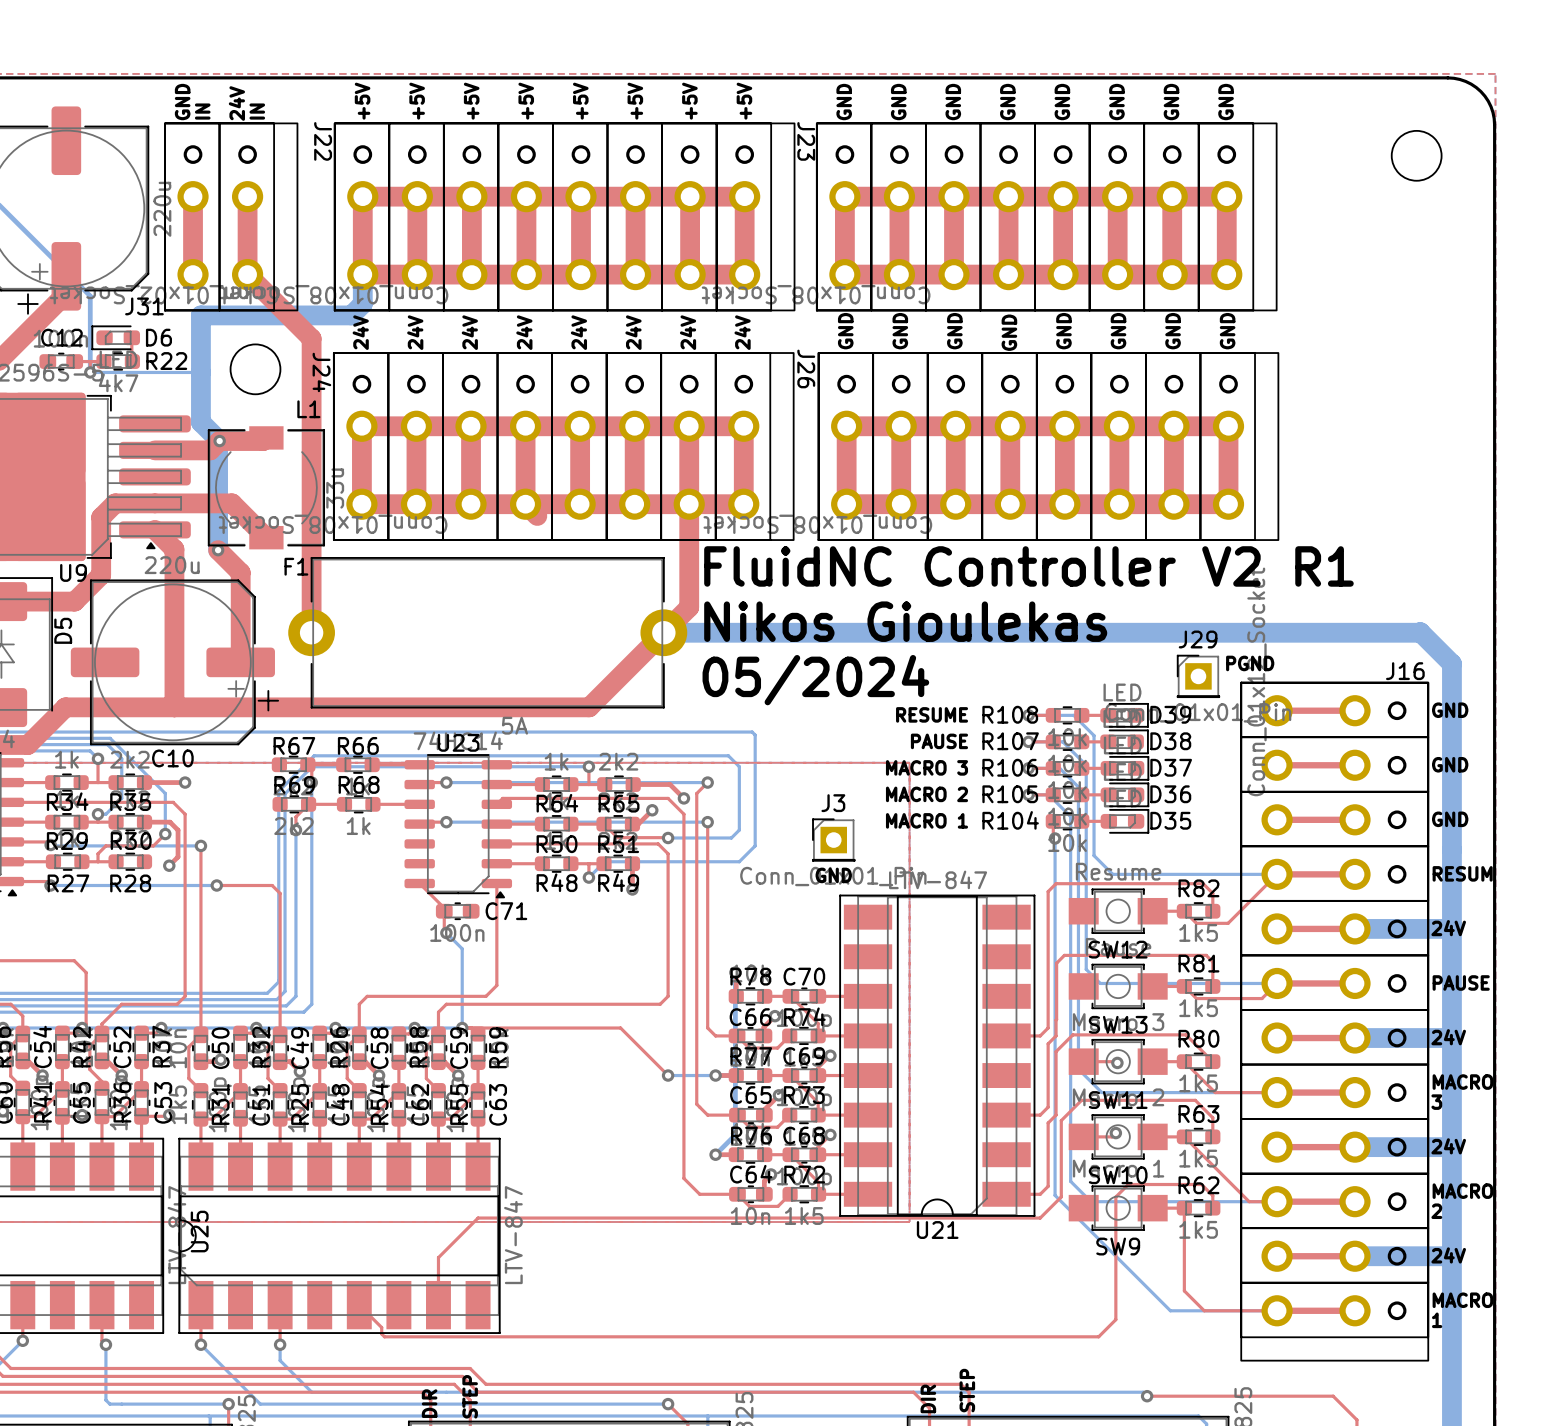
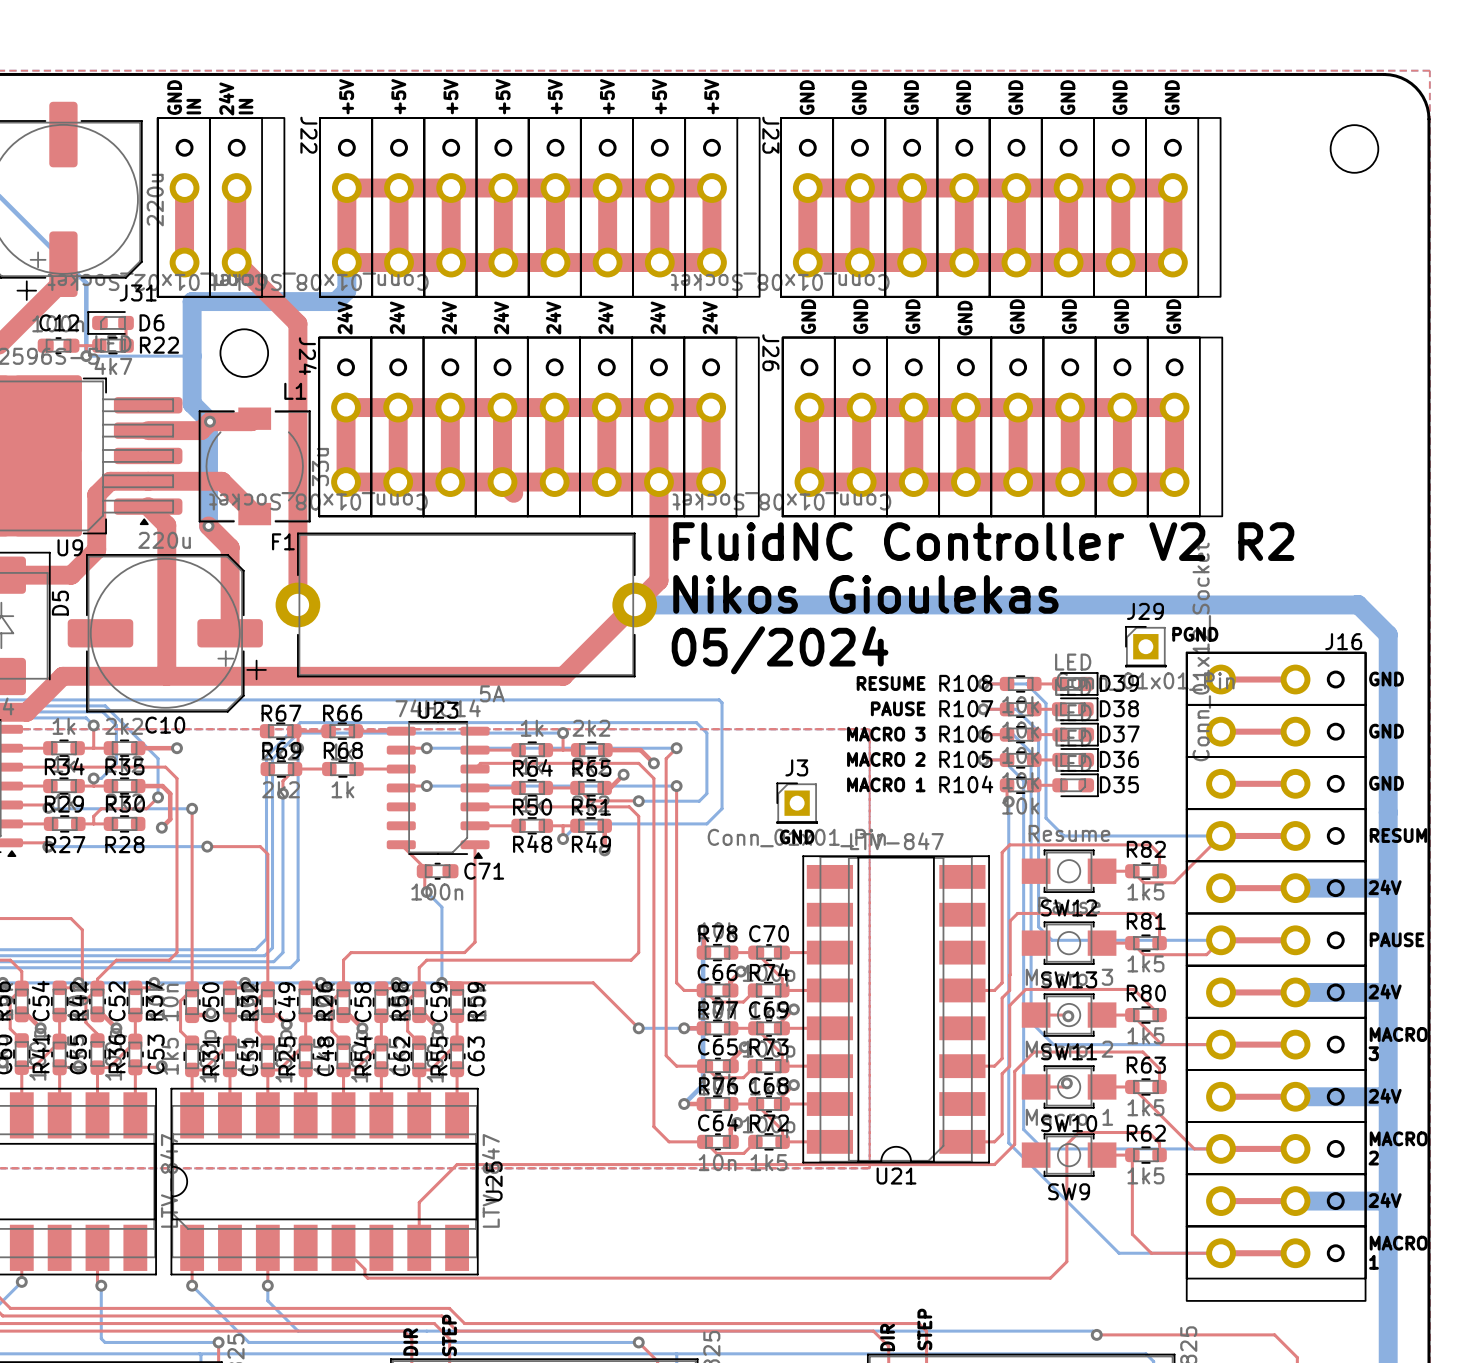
text: FluidNC Controller V2 R1 (1028, 566) -> FluidNC Controller V2 R2 (983, 541)
U25 name position: U25 (199, 1231) -> U25 (494, 1181)

